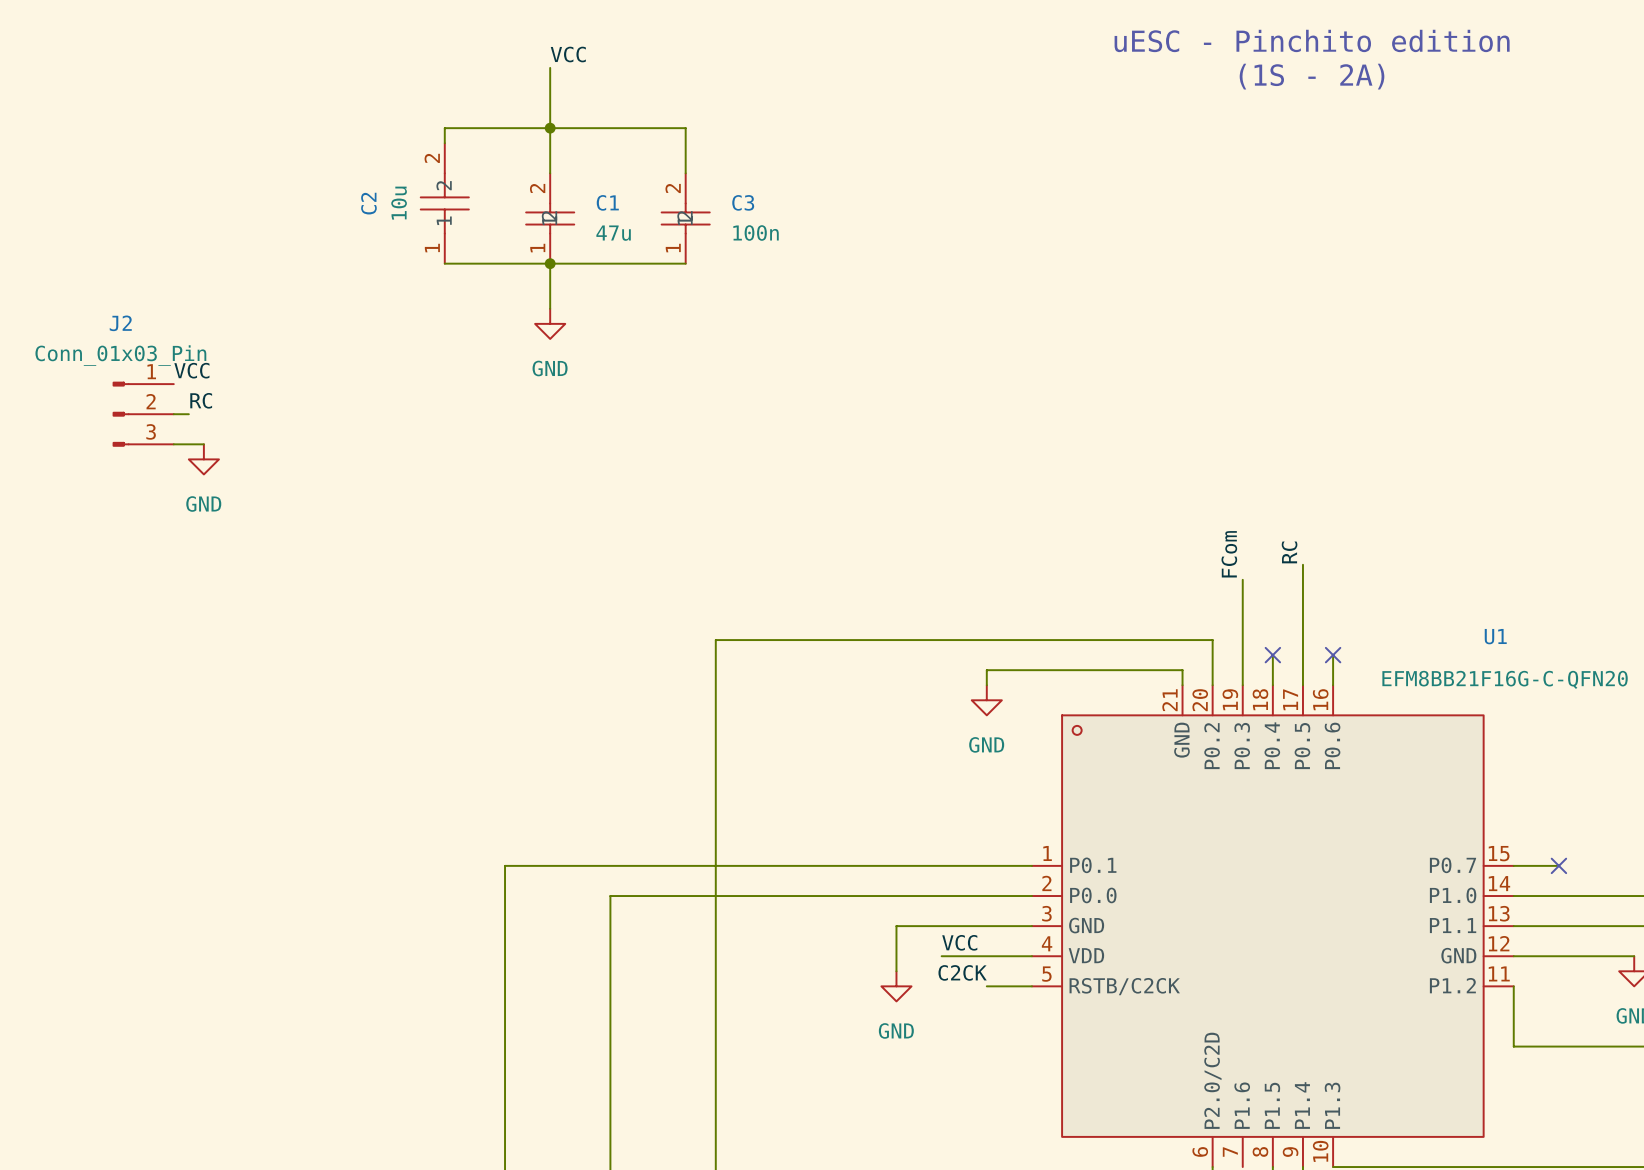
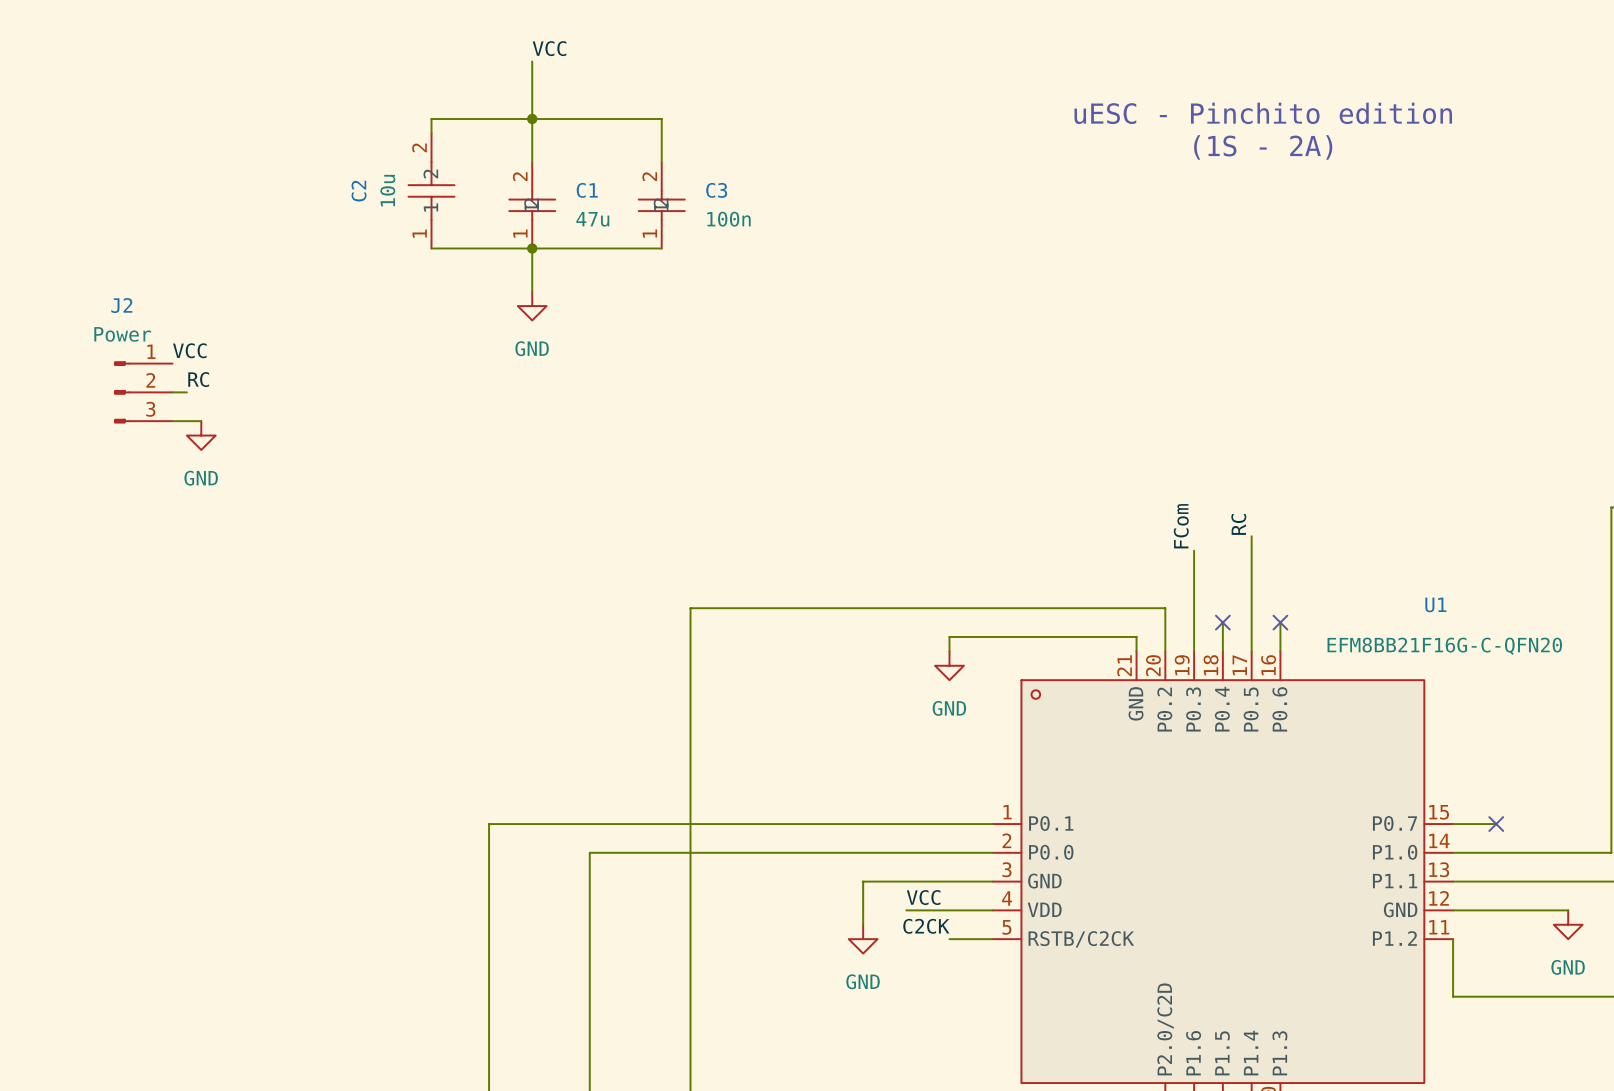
text position: uESC - Pinchito edition (1312, 40) -> uESC - Pinchito edition (1263, 113)
text position: (1S - 2A) (1312, 76) -> (1S - 2A) (1263, 147)
J2 value: Conn_01x03_Pin (120, 355) -> Power (122, 334)

